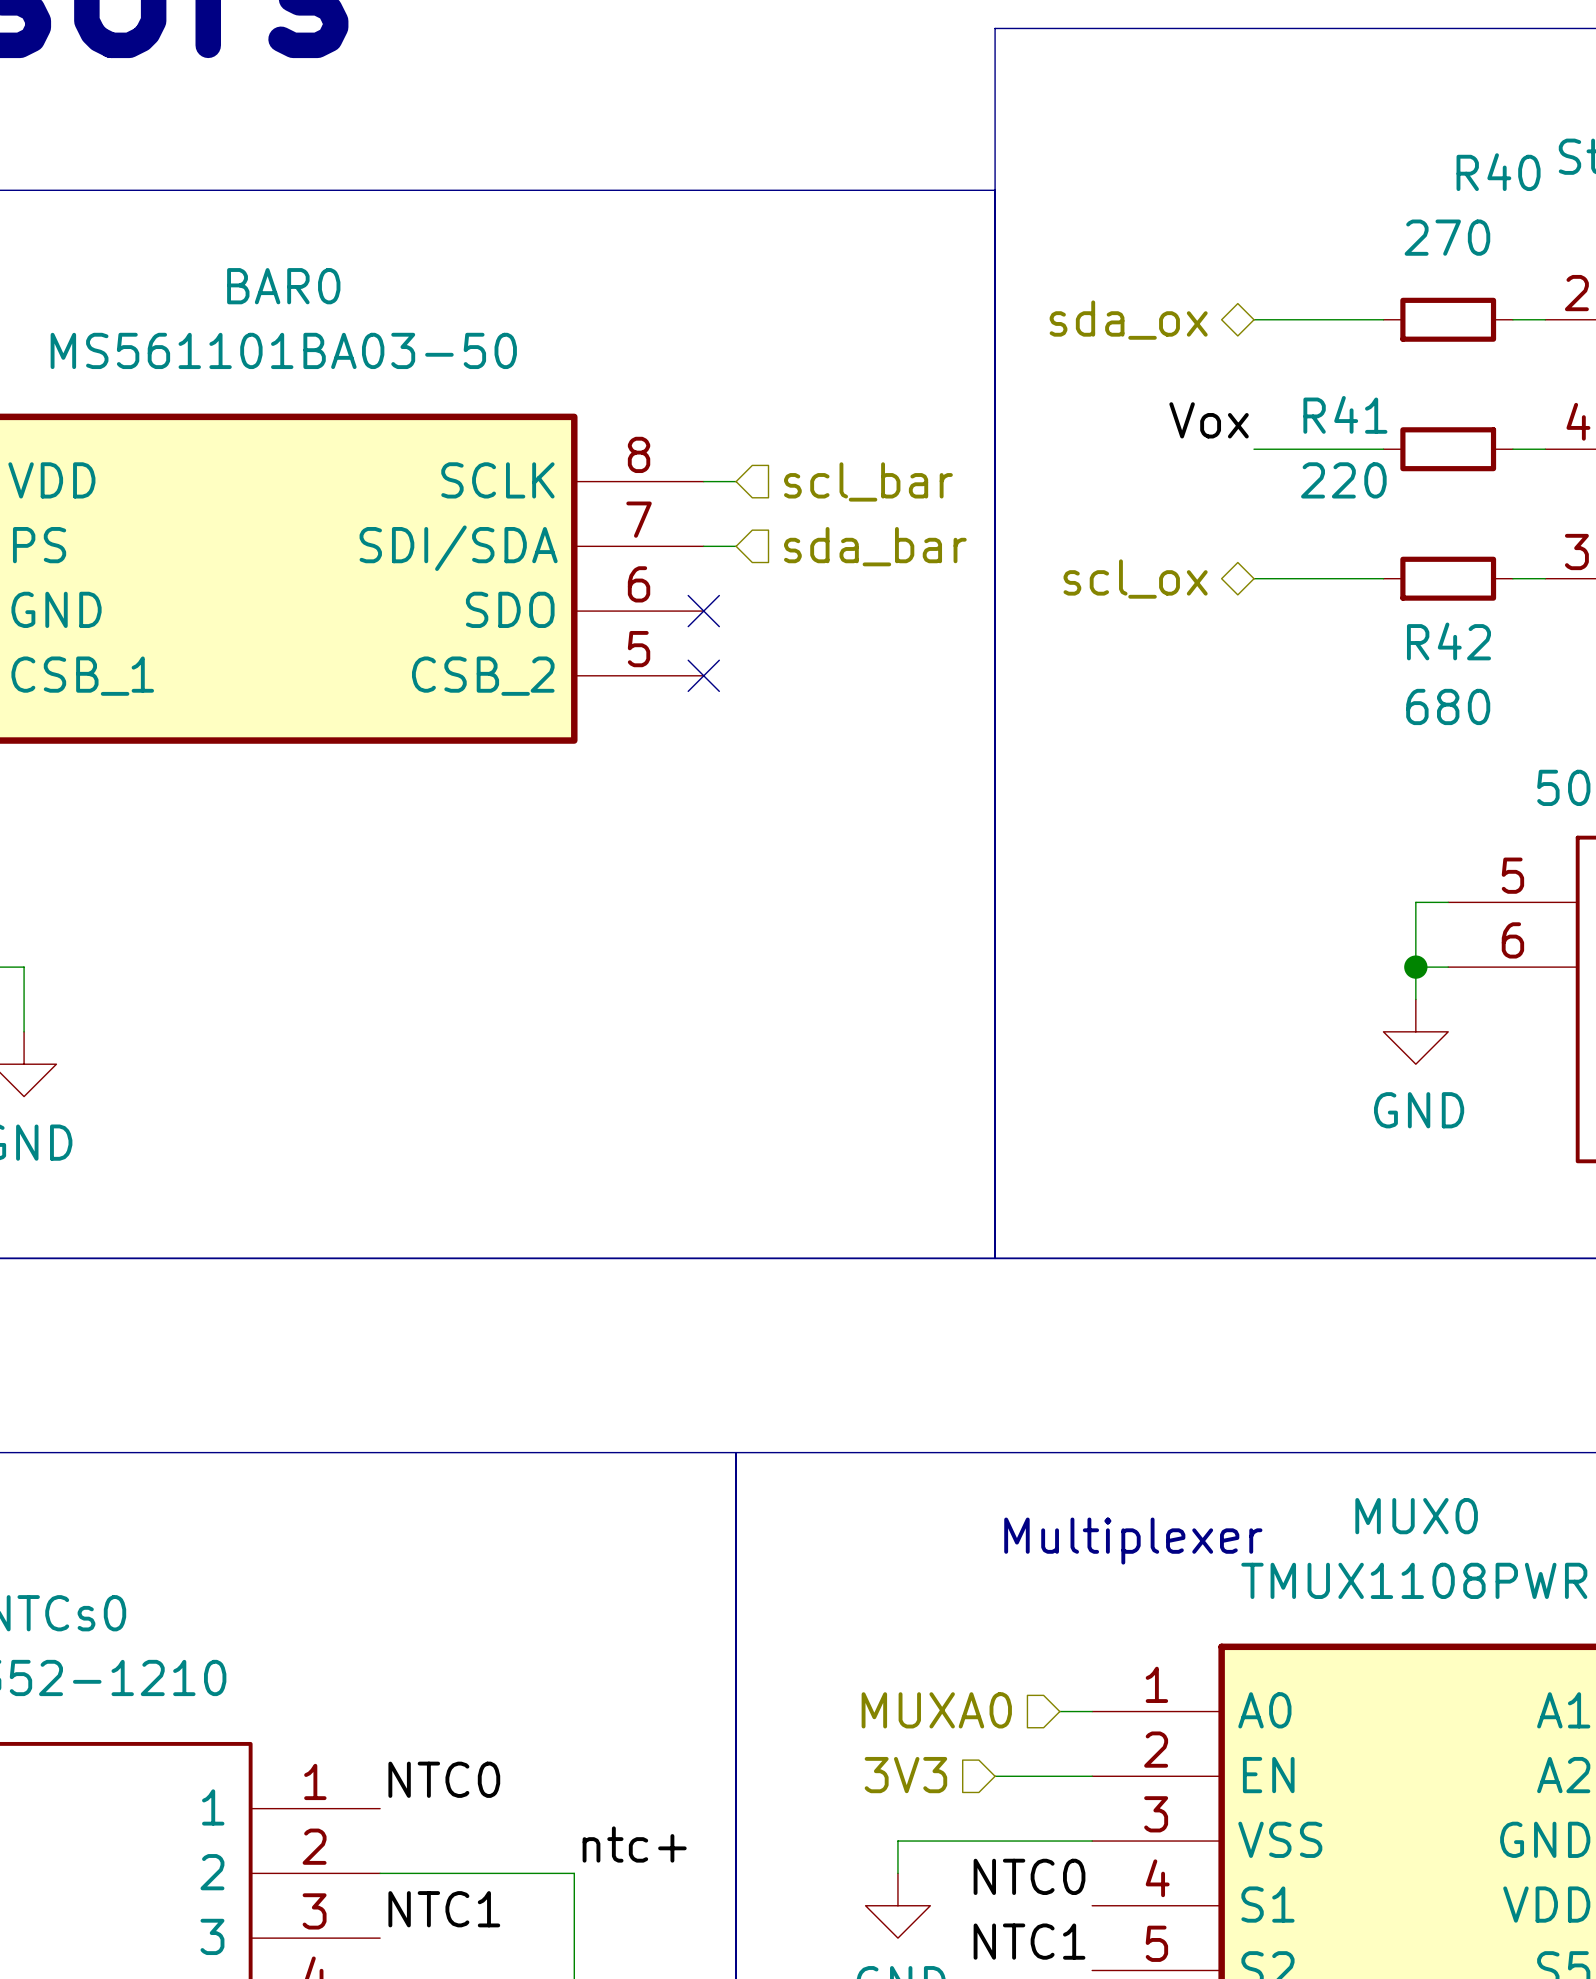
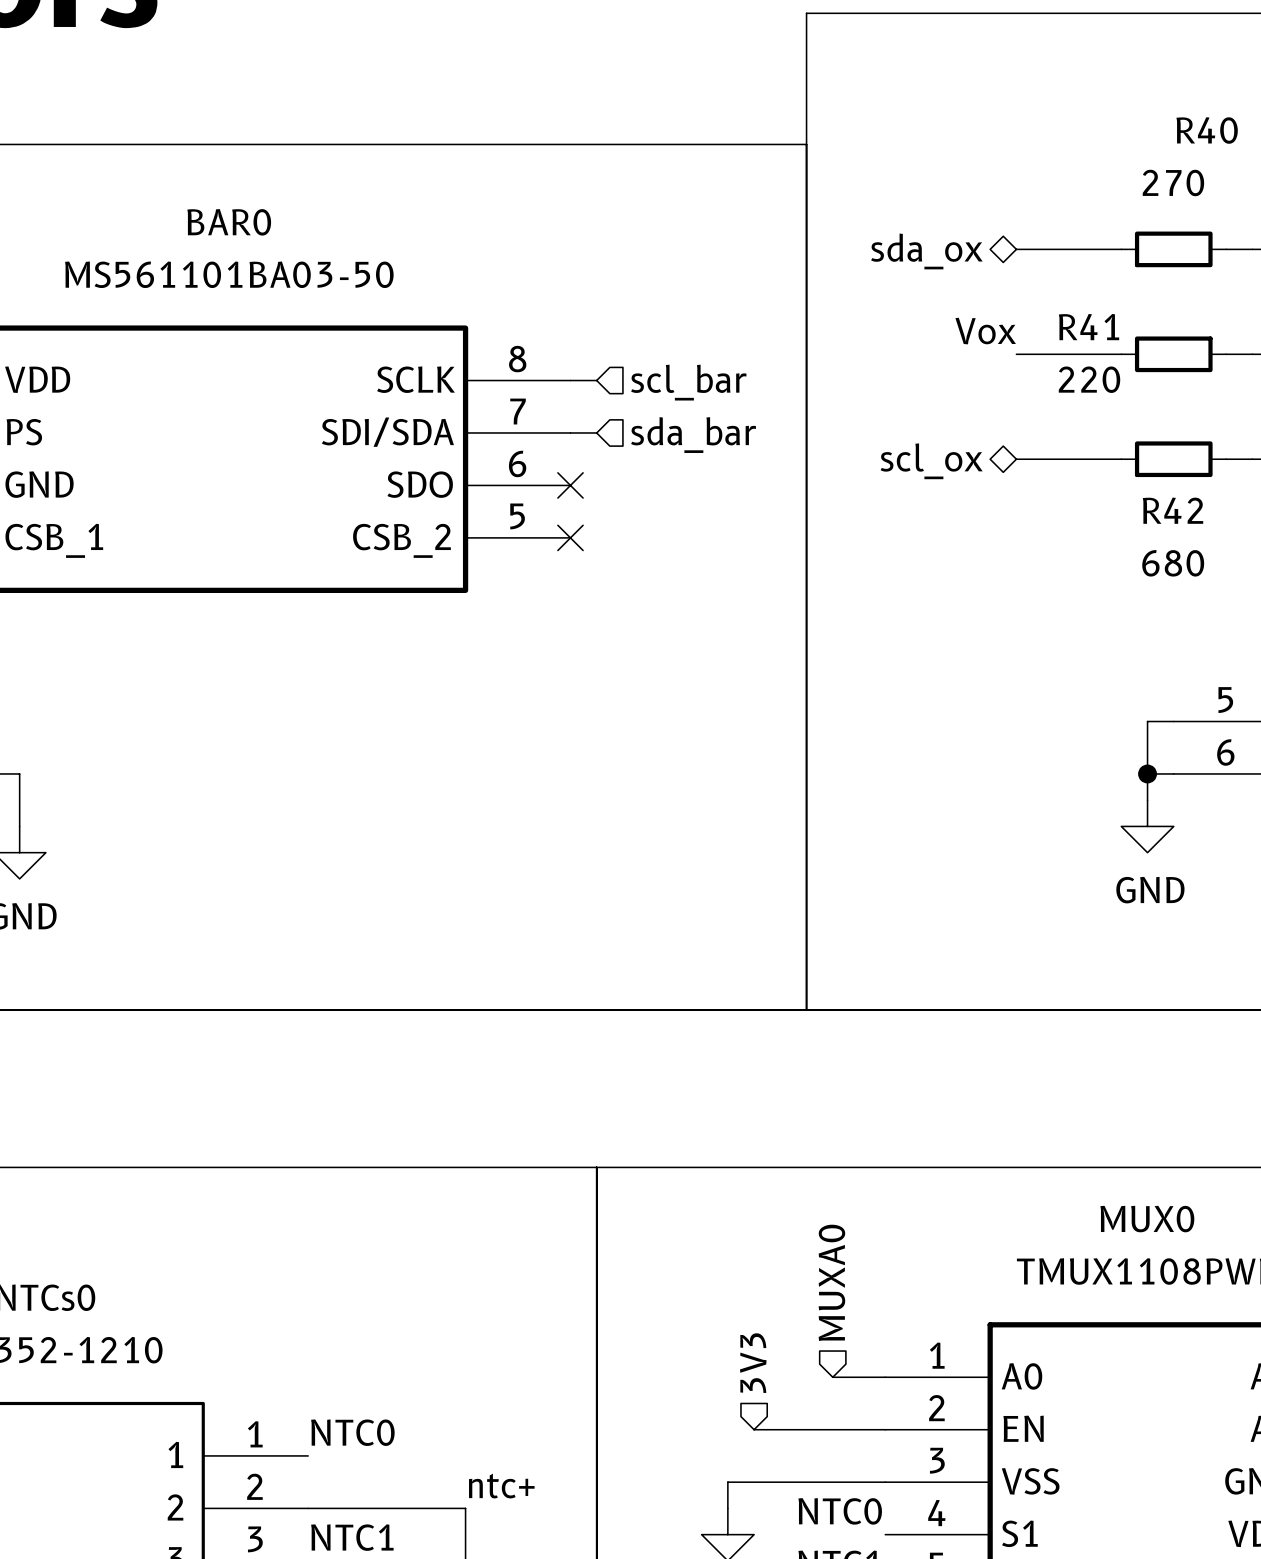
text: Multiplexer (1133, 1541) -> none
hierarchical label rotation: 0° (936, 1710) -> 90° clockwise (831, 1282)
wire: none -> (832, 1377) (859, 1377)
hierarchical label rotation: 0° (905, 1775) -> 90° clockwise (753, 1363)
wire: none -> (754, 1429) (806, 1429)

